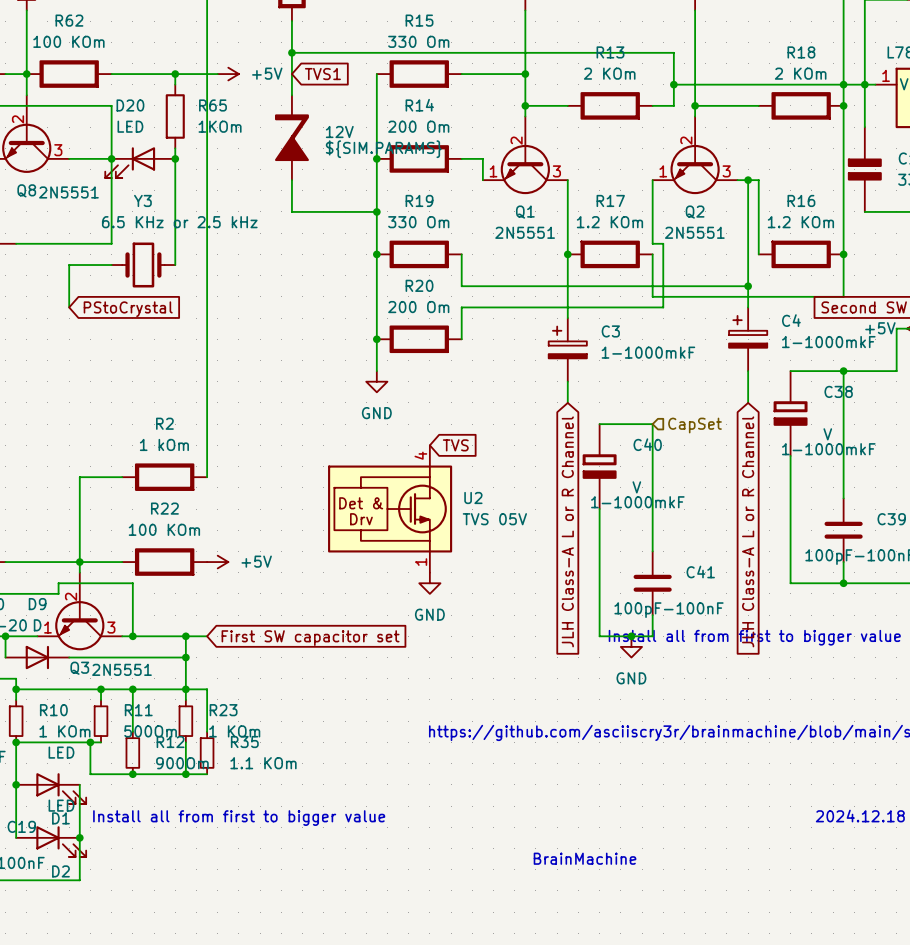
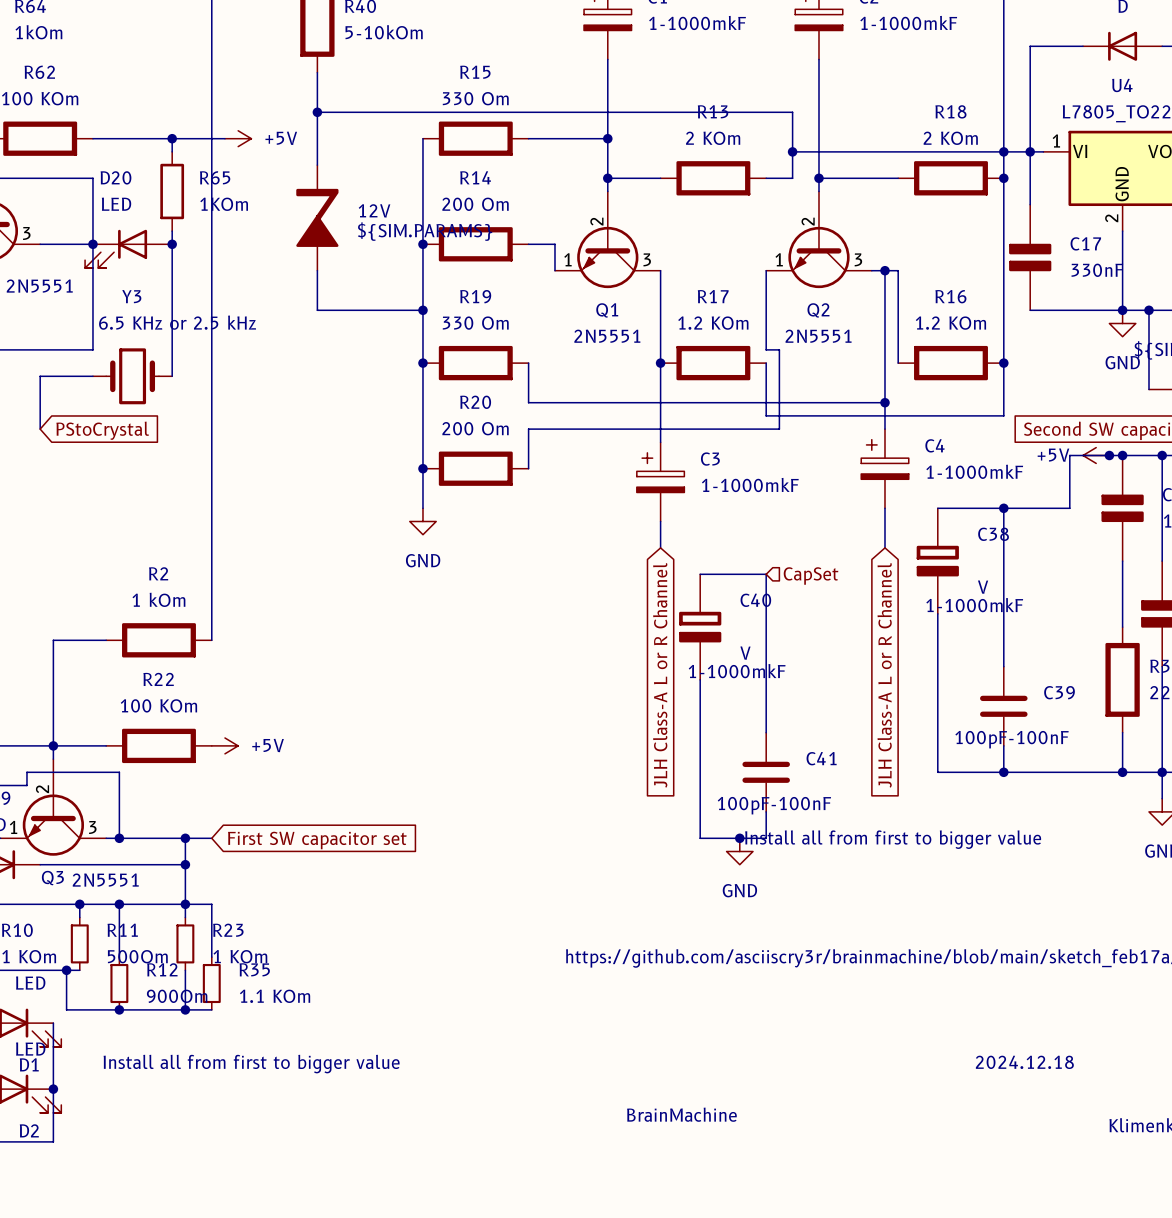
global label: TVS1 (322, 74) -> none
global label: TVS (455, 445) -> none
U2: TVS 05V (390, 509) -> none
power symbol: GND (429, 583) -> none

